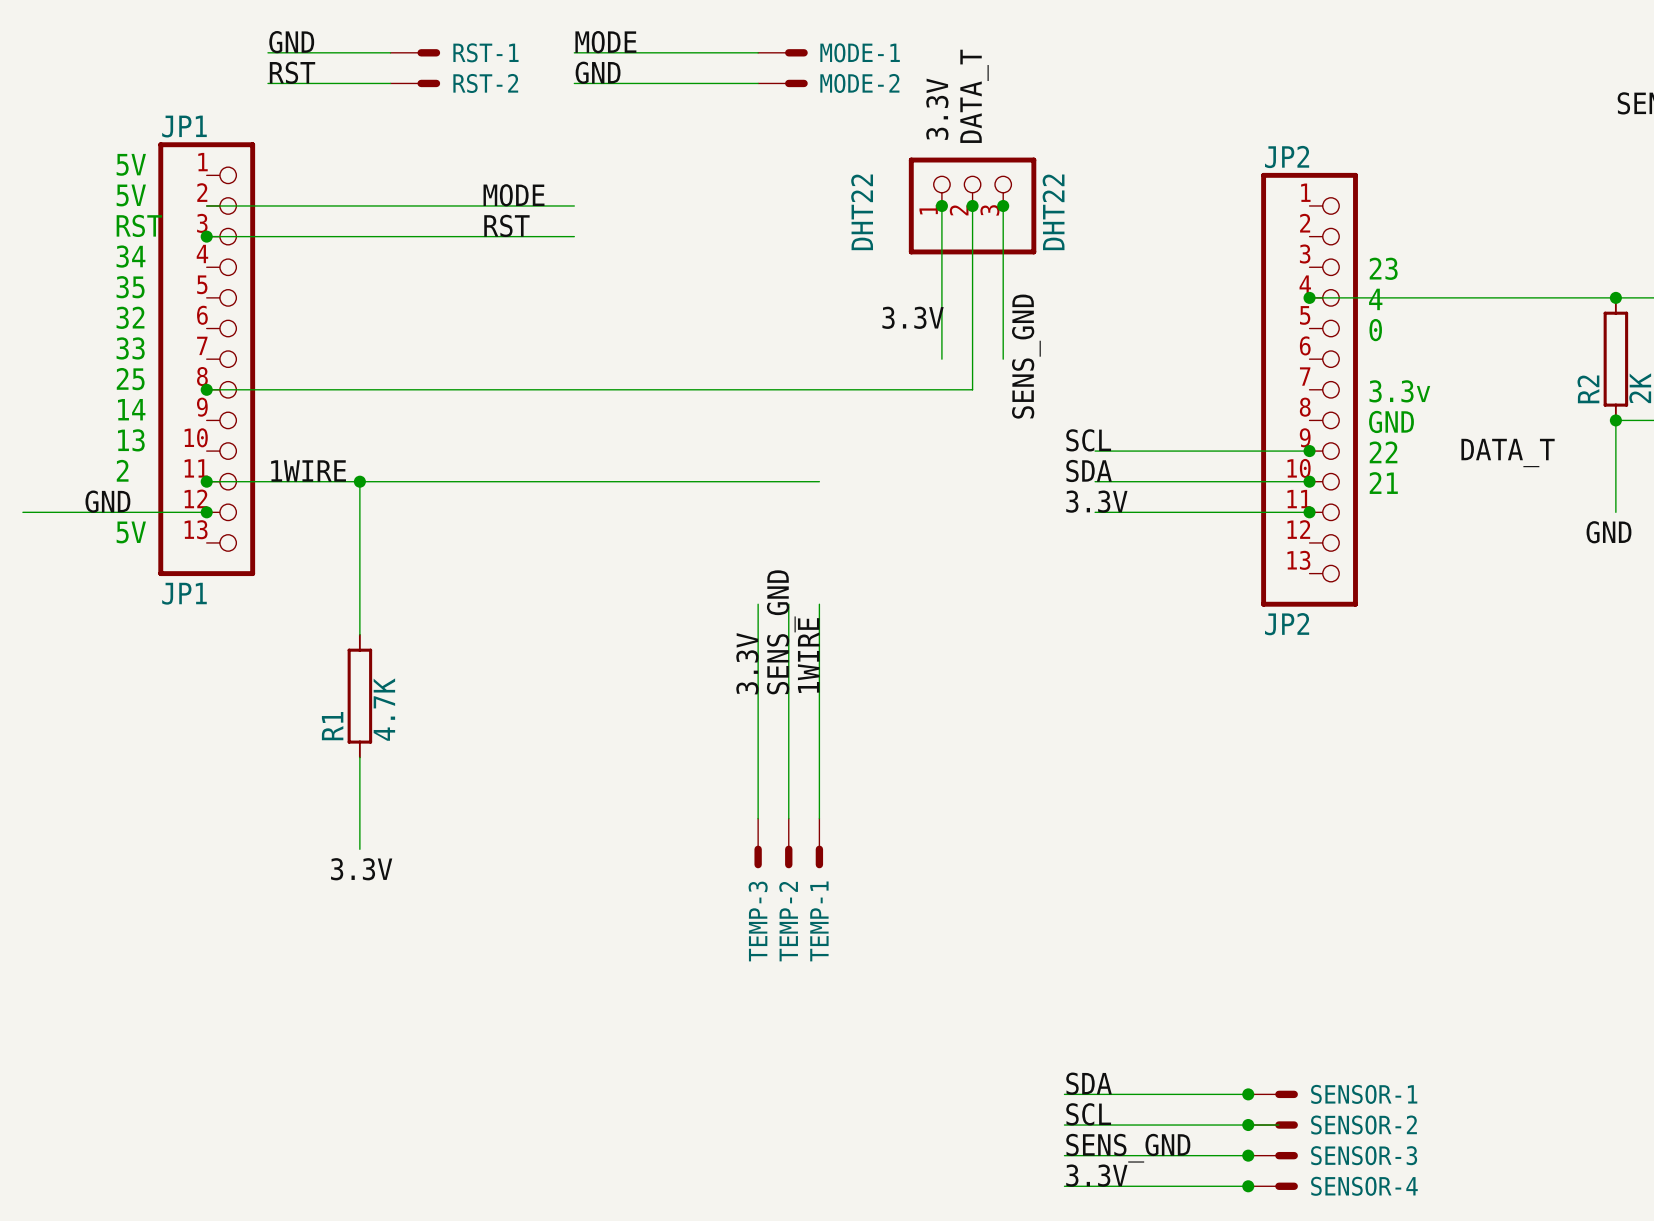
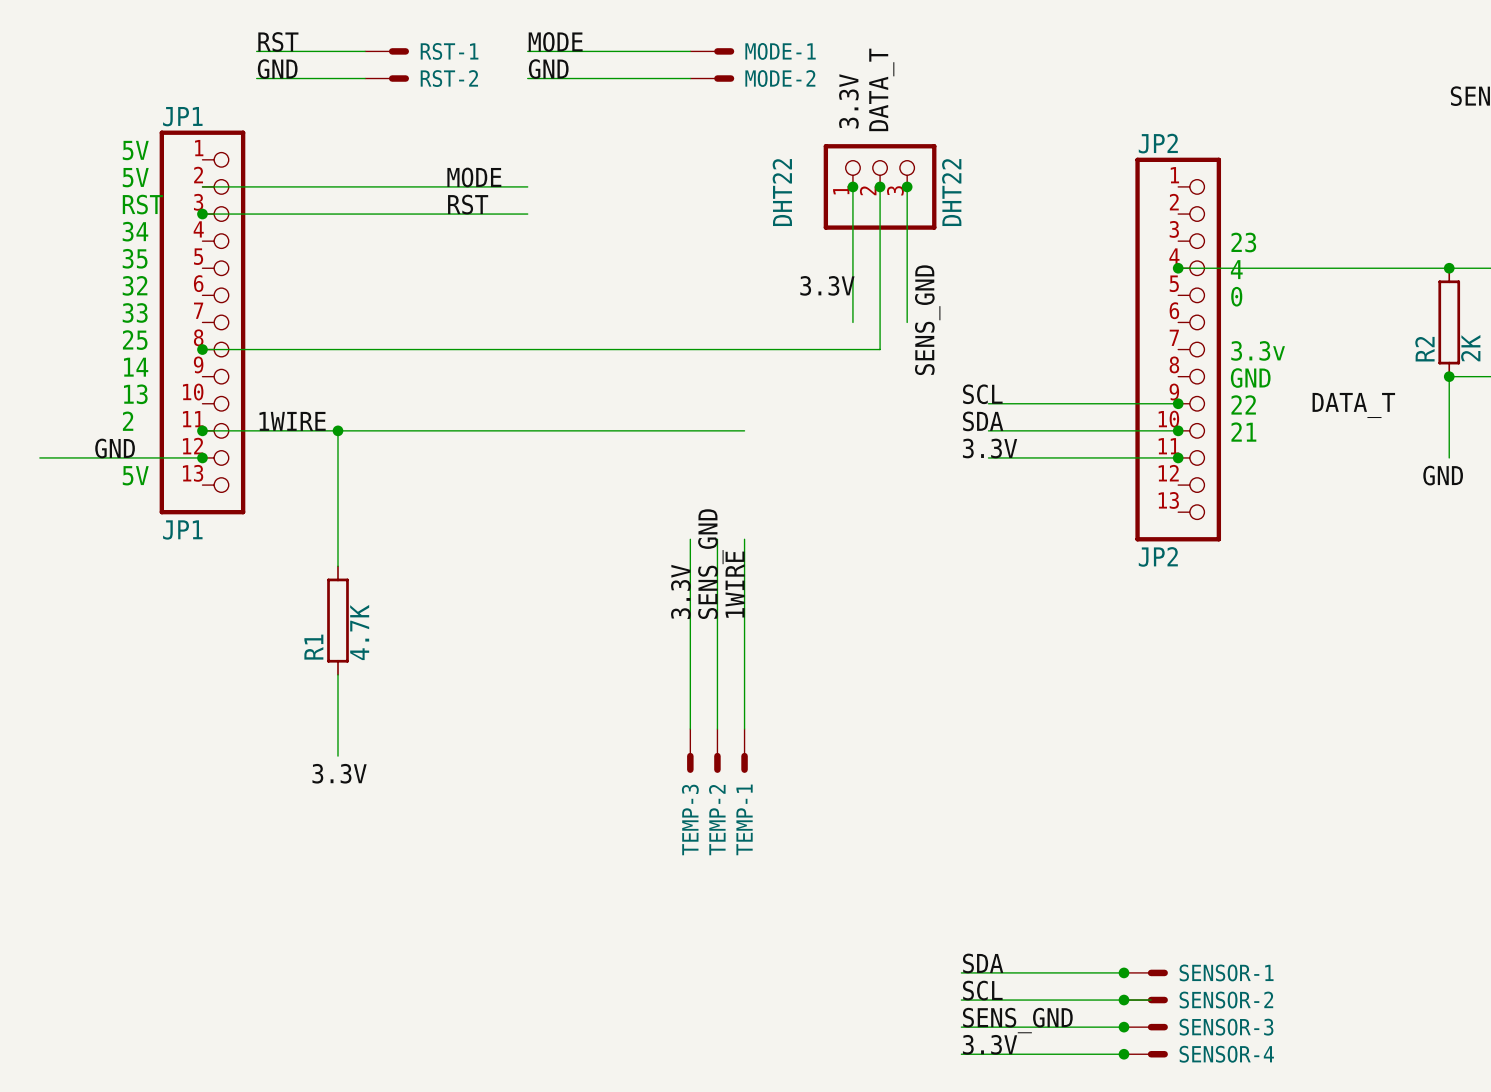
label: GND (291, 42) -> RST (278, 41)
label: RST (292, 72) -> GND (277, 69)

